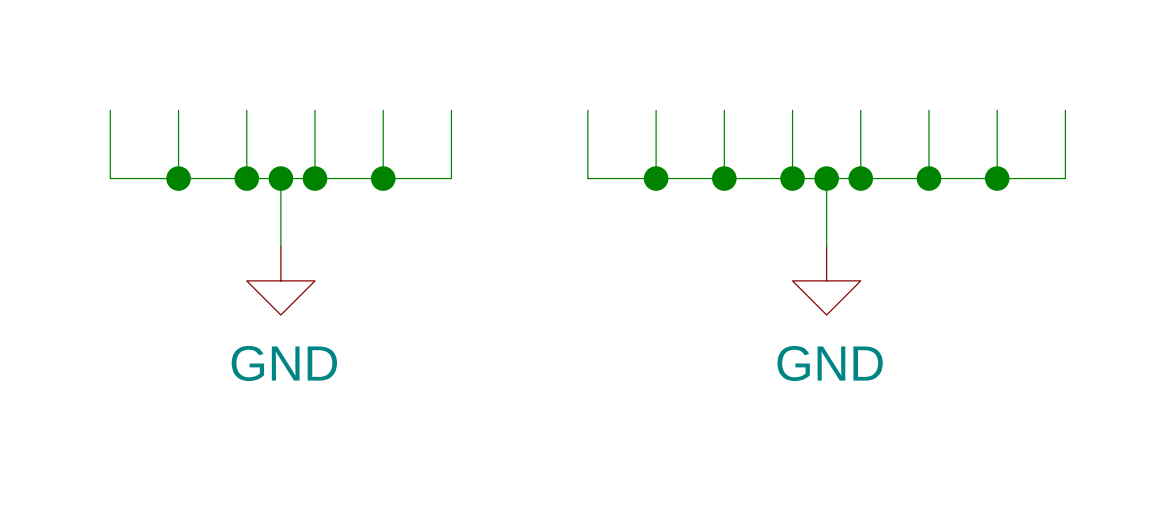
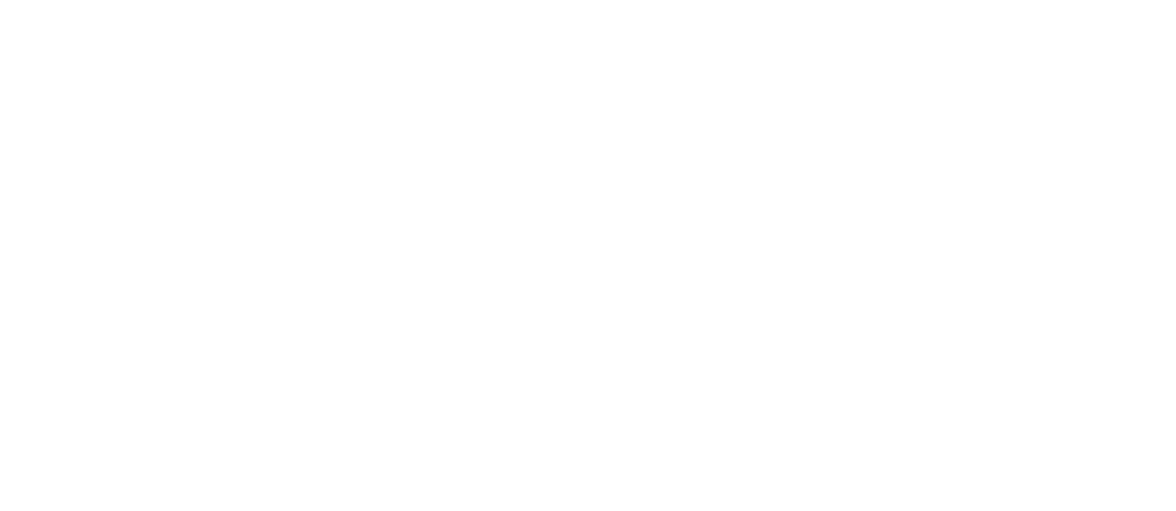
wire: (110, 110) (110, 178) (451, 178) (451, 110) -> none
wire: (178, 110) (178, 178) -> none
wire: (246, 110) (246, 178) -> none
wire: (314, 110) (314, 178) -> none
wire: (383, 110) (383, 178) -> none
wire: (587, 110) (587, 178) (1065, 178) (1065, 110) -> none
wire: (656, 110) (656, 178) -> none
wire: (724, 110) (724, 178) -> none
wire: (792, 110) (792, 178) -> none
wire: (860, 110) (860, 178) -> none
wire: (928, 110) (928, 178) -> none
wire: (997, 110) (997, 178) -> none
junction: (178, 178) -> none
junction: (246, 178) -> none
wire: (280, 178) (280, 246) -> none
junction: (280, 178) -> none
junction: (314, 178) -> none
junction: (383, 178) -> none
junction: (656, 178) -> none
junction: (724, 178) -> none
junction: (792, 178) -> none
wire: (826, 178) (826, 246) -> none
junction: (826, 178) -> none
junction: (860, 178) -> none
junction: (928, 178) -> none
junction: (997, 178) -> none
power symbol: GND (280, 280) -> none
power symbol: GND (826, 280) -> none

